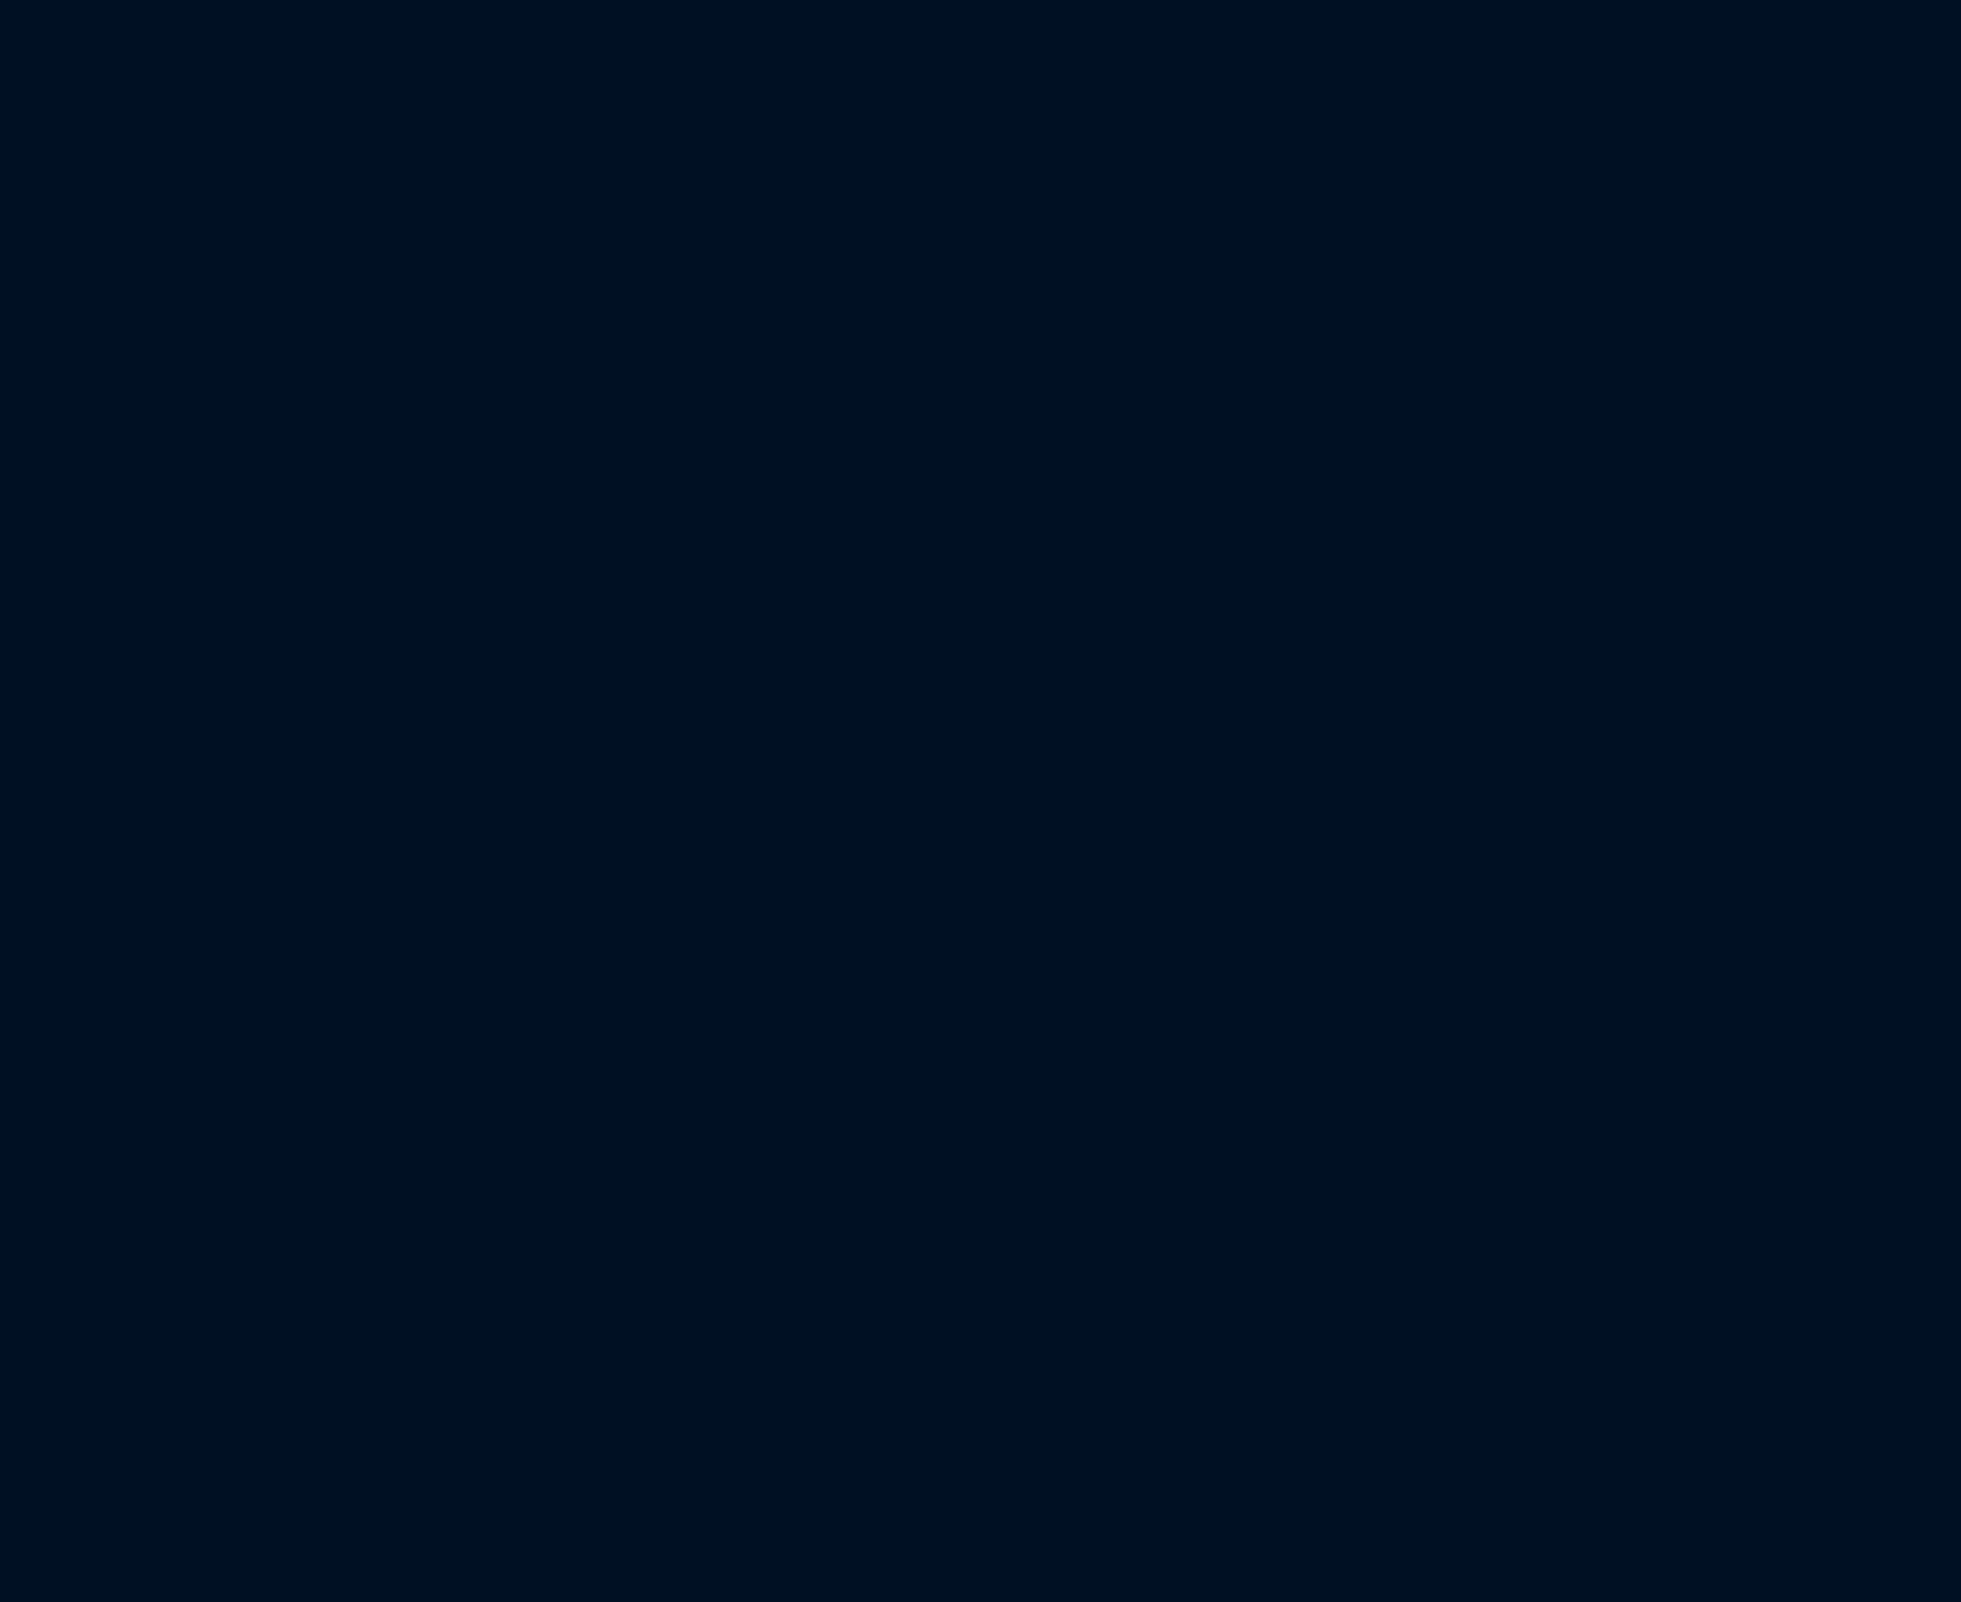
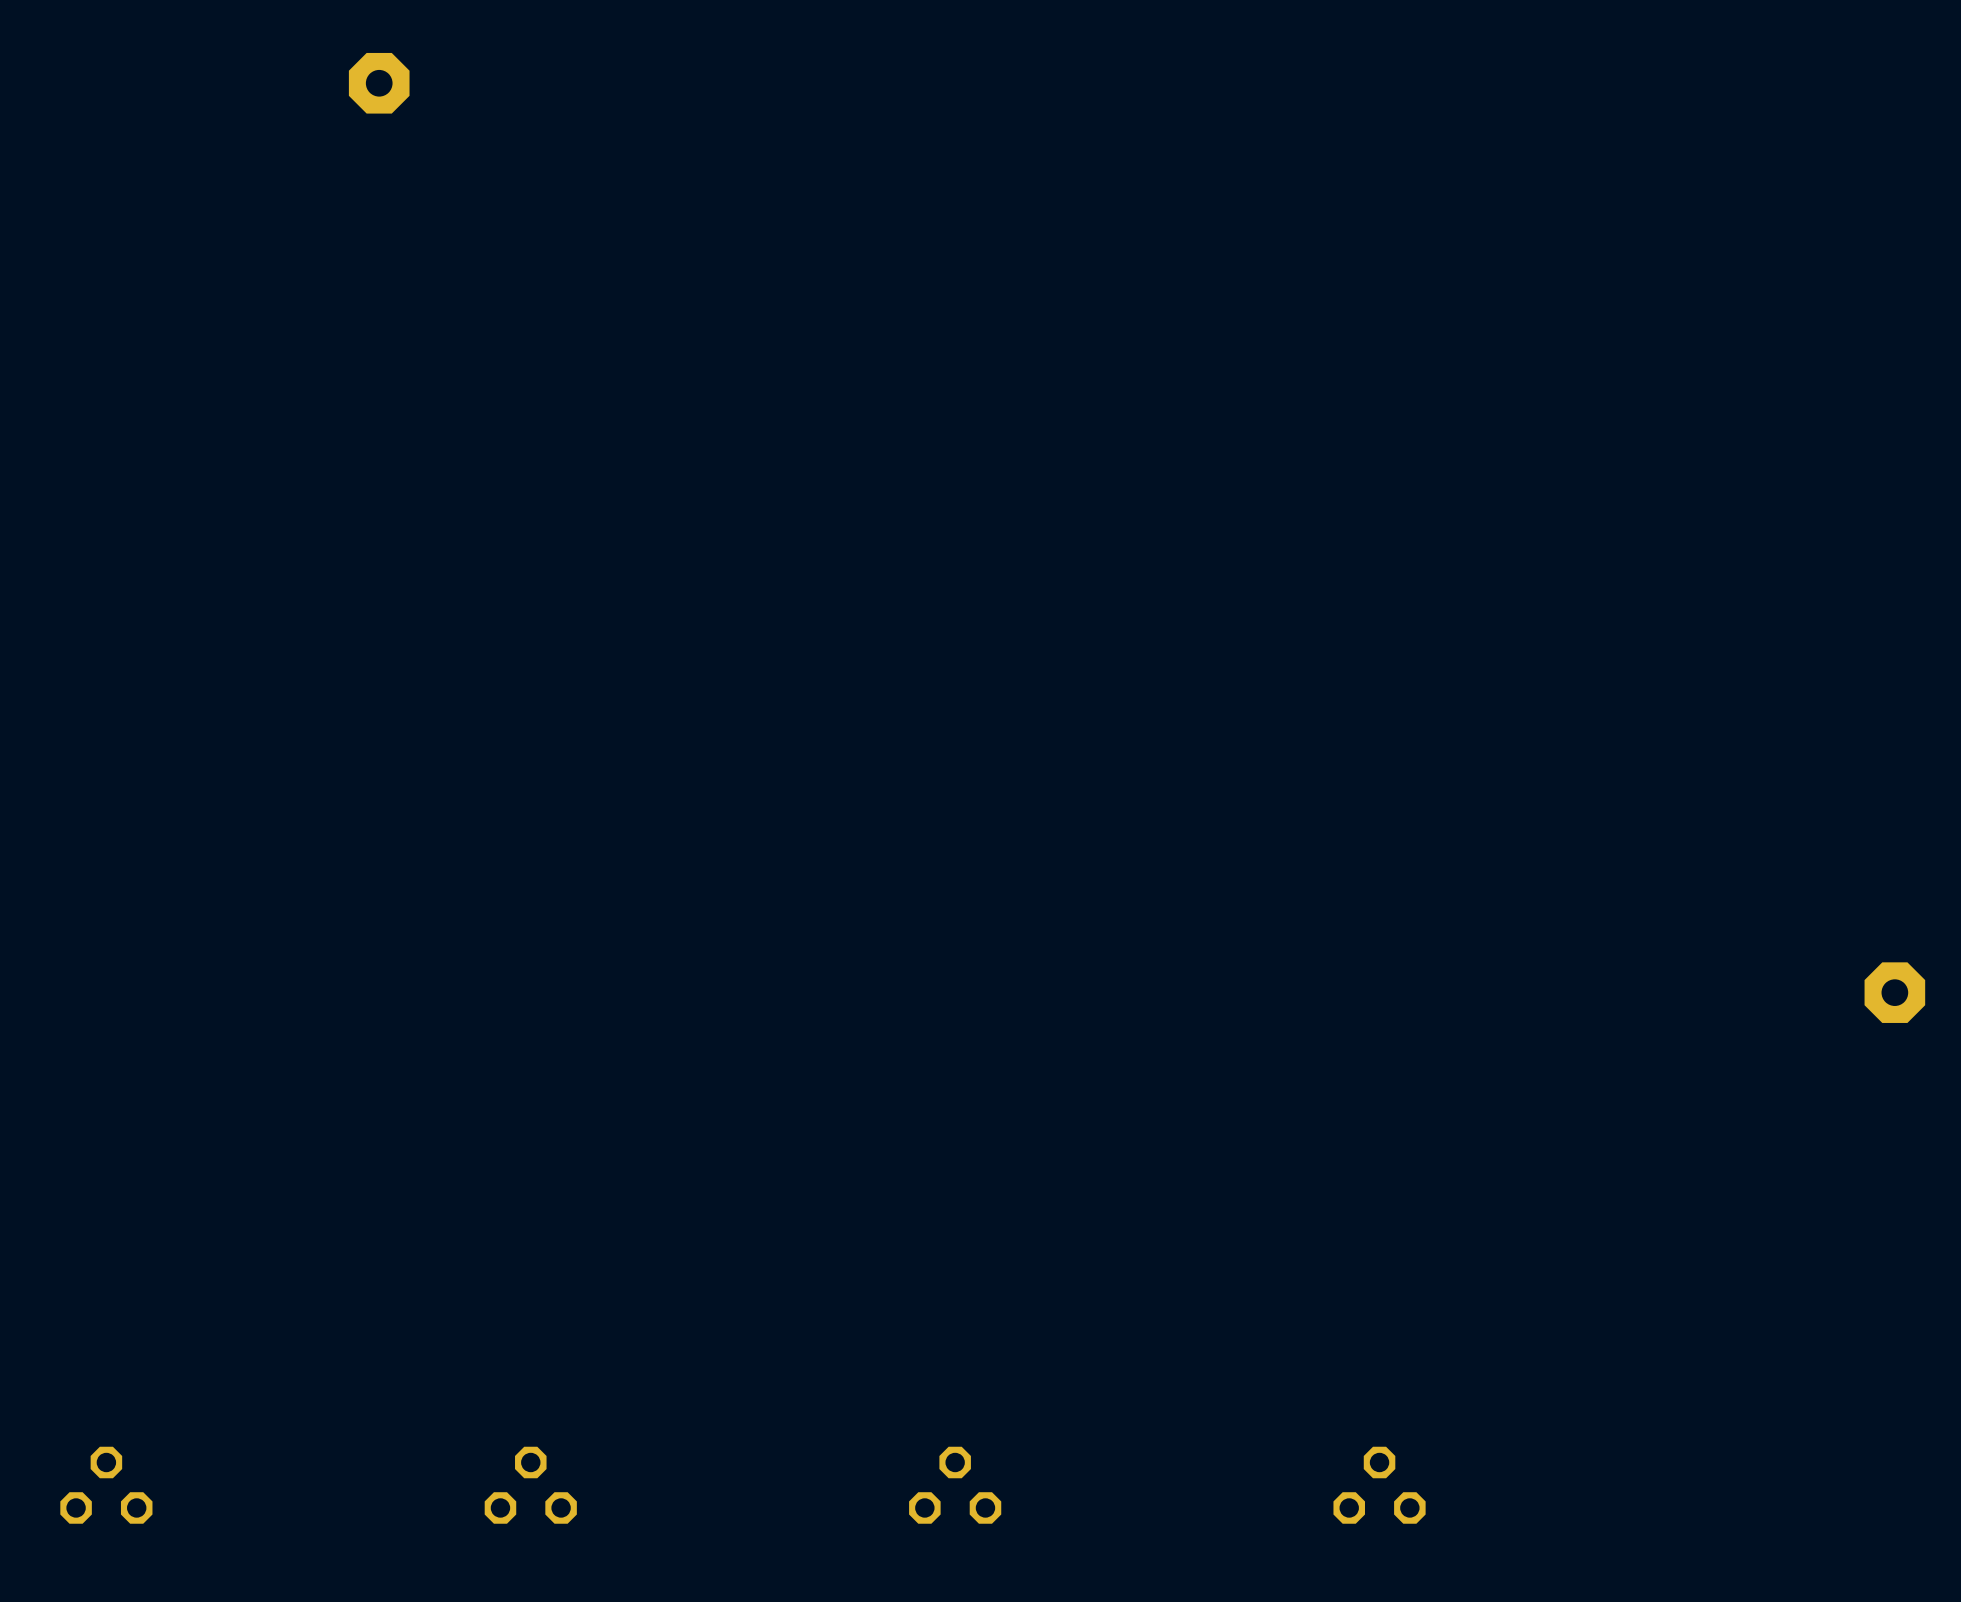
part: none -> (379, 83)
part: none -> (1894, 992)
part: none -> (106, 1485)
part: none -> (530, 1485)
part: none -> (955, 1485)
part: none -> (1379, 1485)

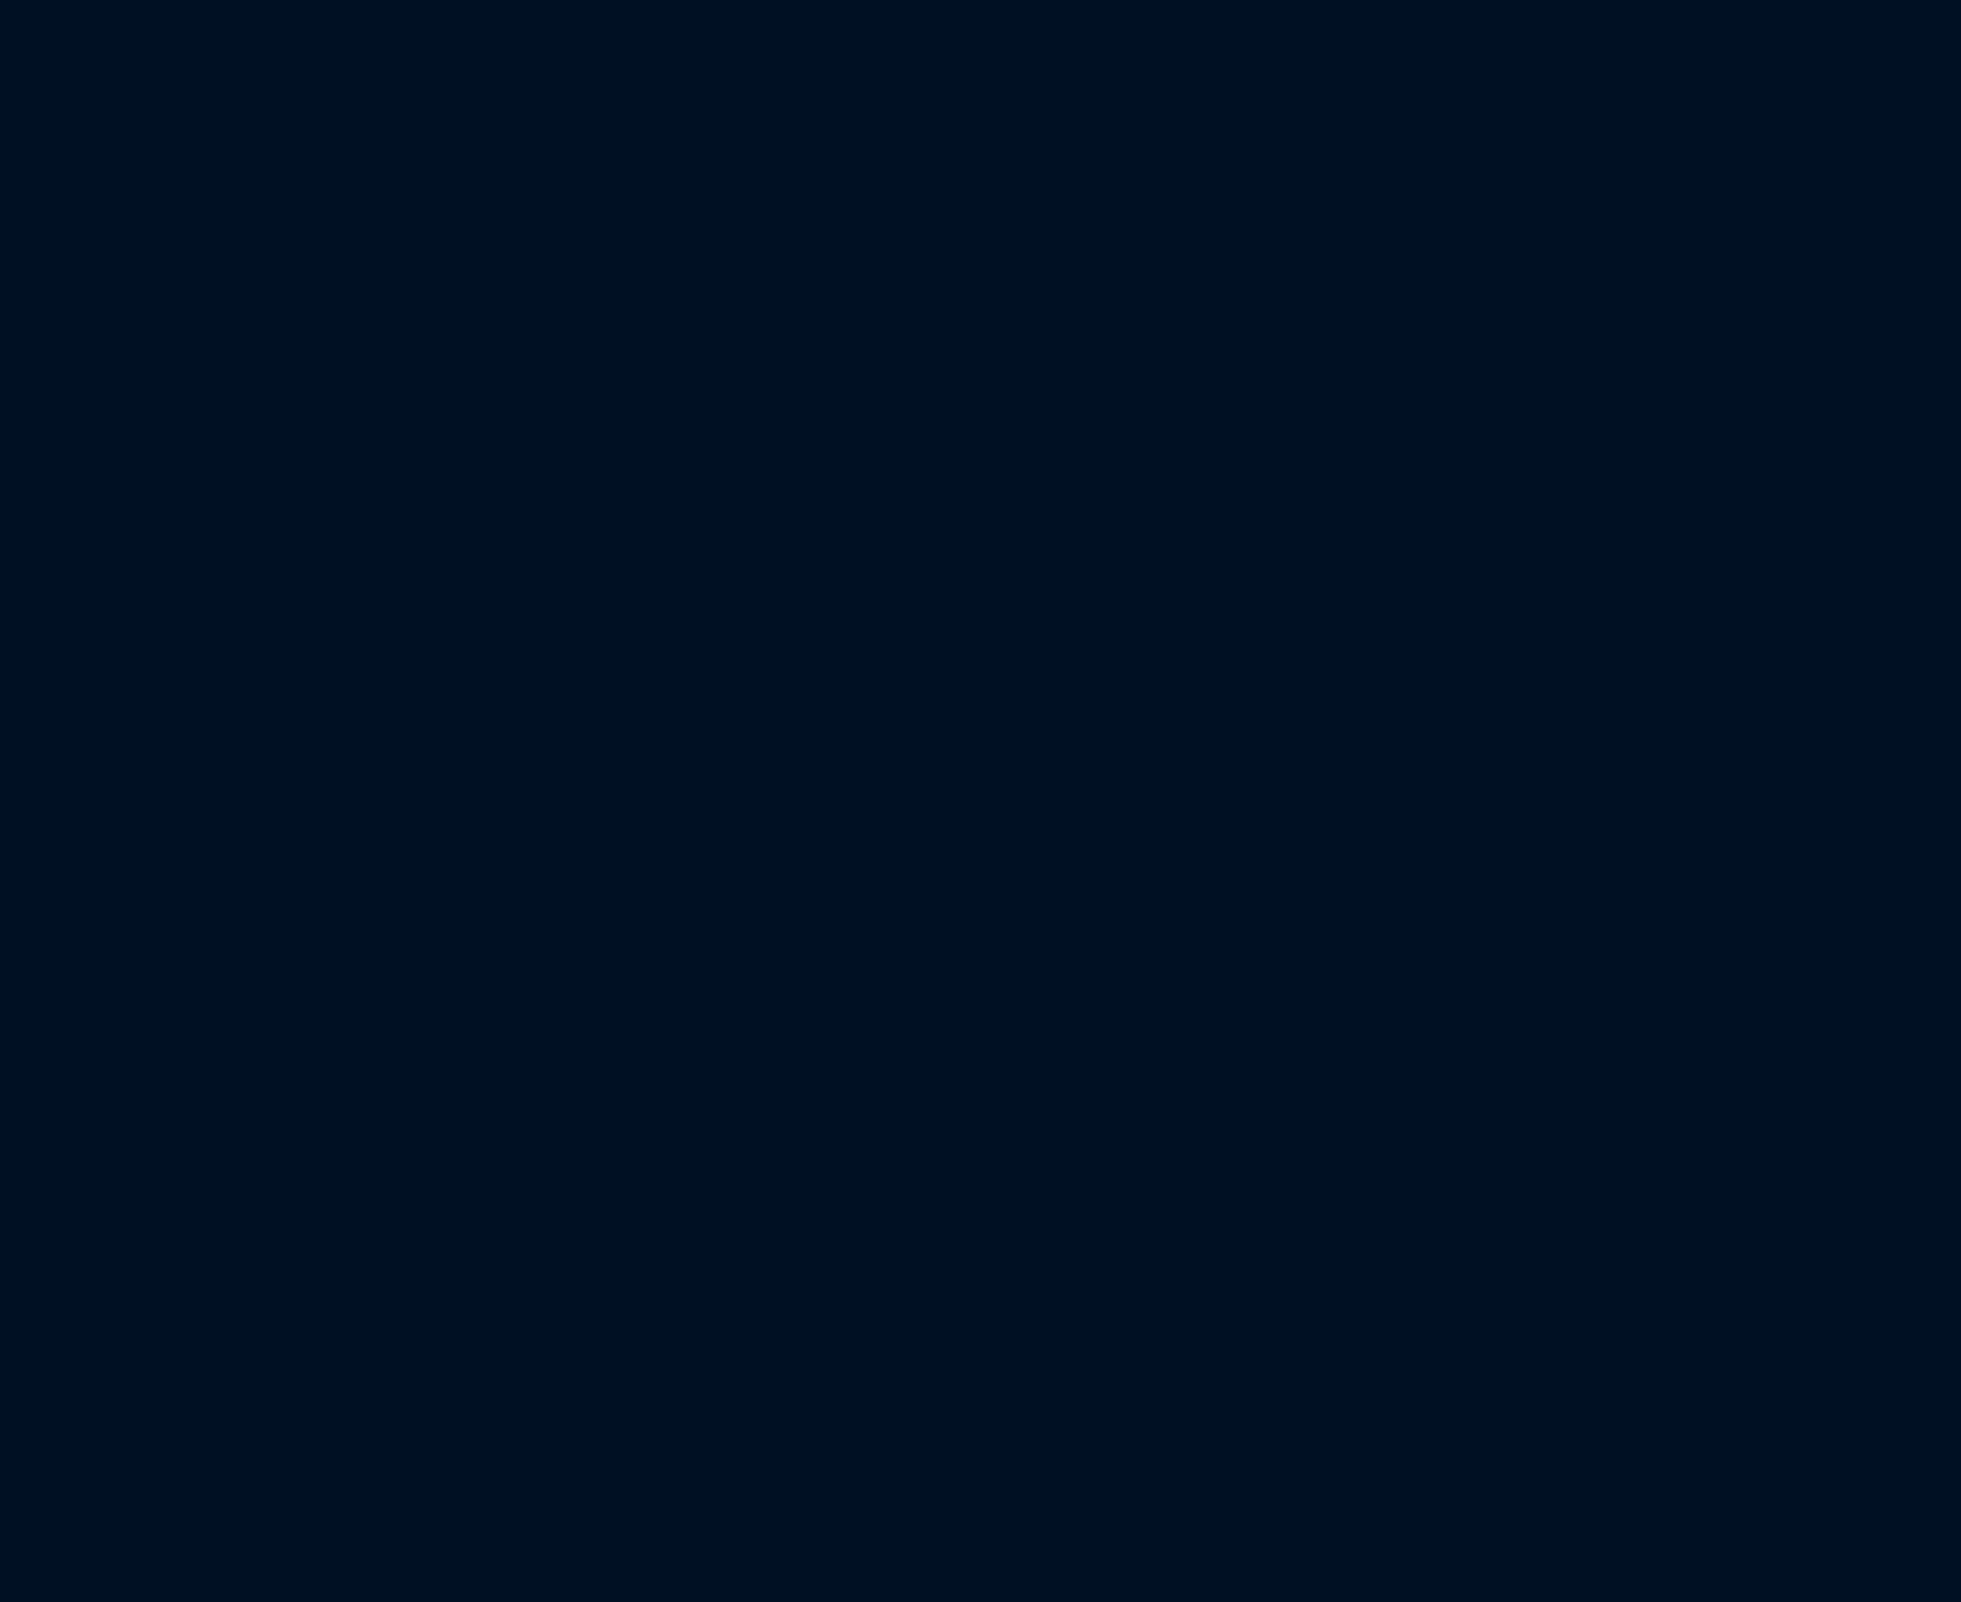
part: (379, 83) -> none
part: (1894, 992) -> none
part: (106, 1485) -> none
part: (530, 1485) -> none
part: (955, 1485) -> none
part: (1379, 1485) -> none

